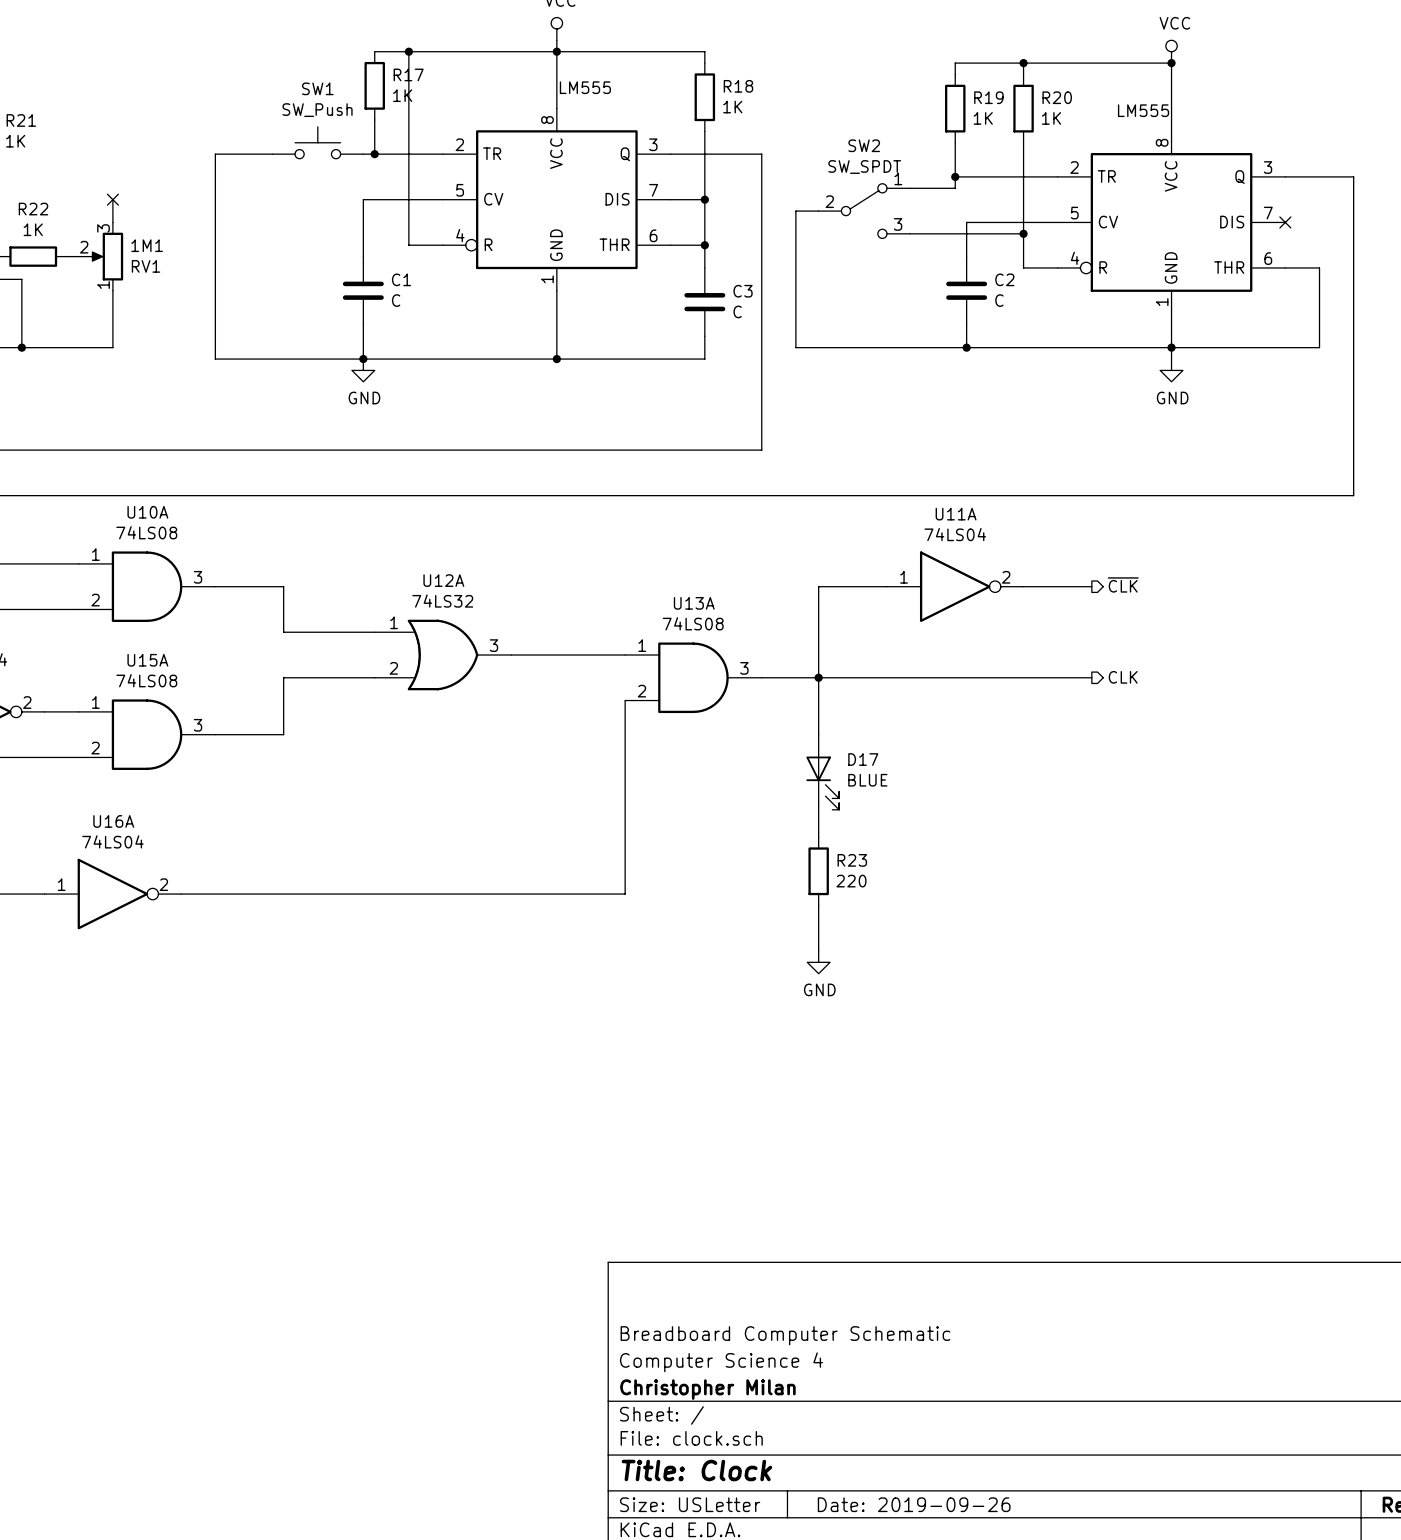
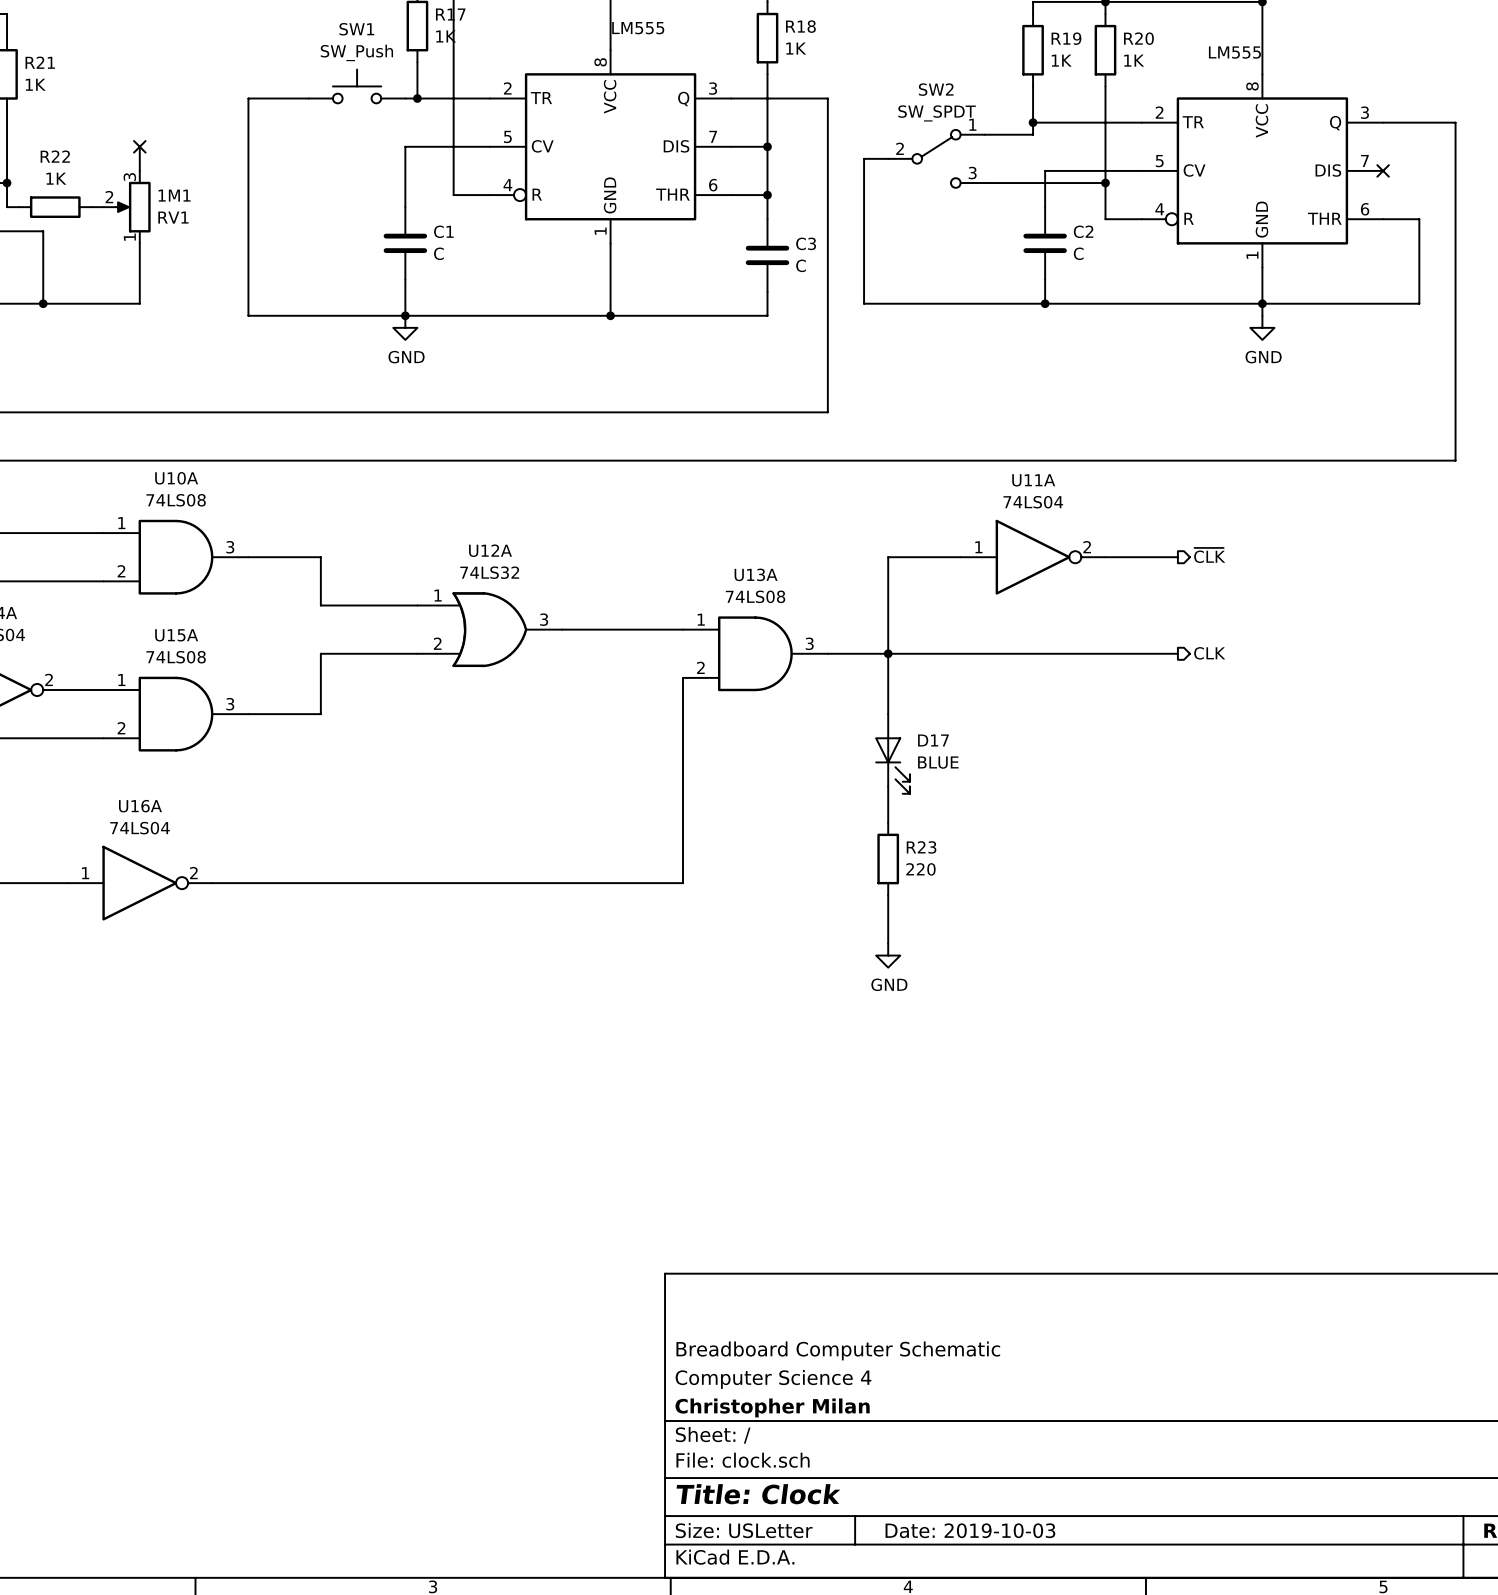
title block: Date: 2019-09-26 (914, 1504) -> Date: 2019-10-03 (970, 1530)

